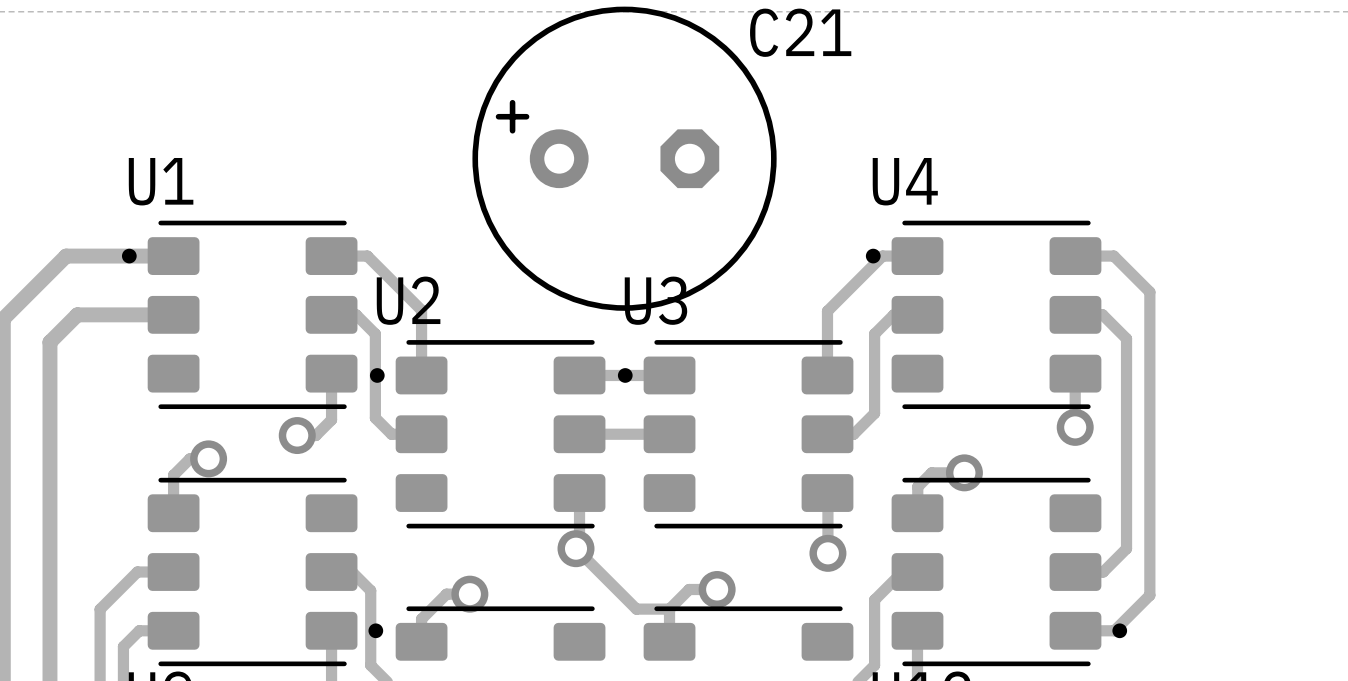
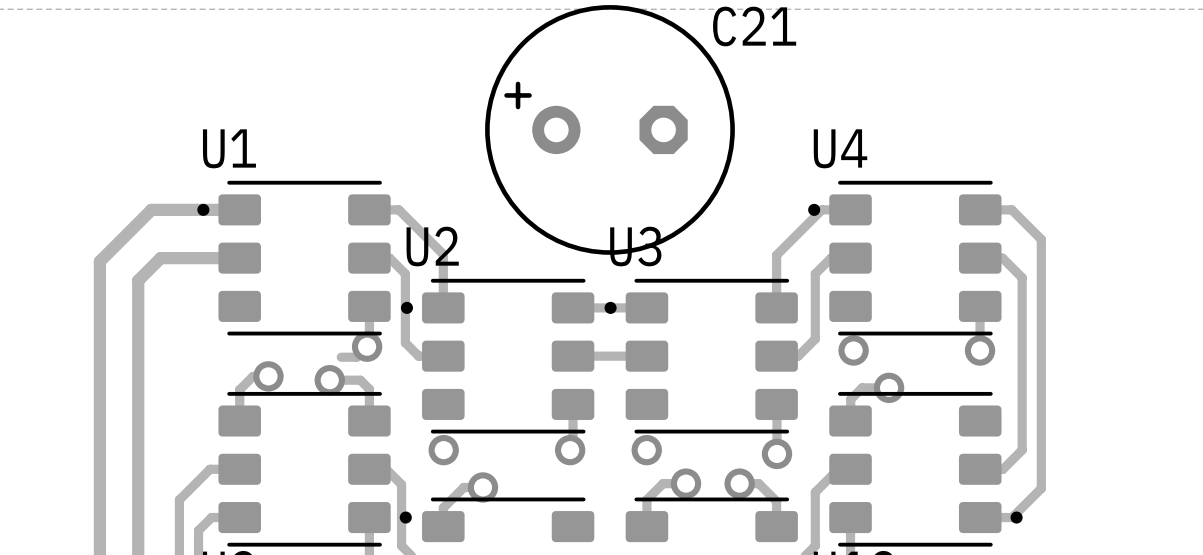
via: none -> (367, 346)
via: none -> (853, 350)
via: (297, 435) -> none
track: none -> (329, 380) (360, 380) (369, 389) (369, 421)
via: none -> (329, 380)
via: none -> (443, 450)
track: (576, 548) (636, 609) (669, 609) -> none
via: none -> (646, 450)
track: none -> (739, 483) (758, 483) (776, 501) (776, 526)
via: none -> (739, 483)

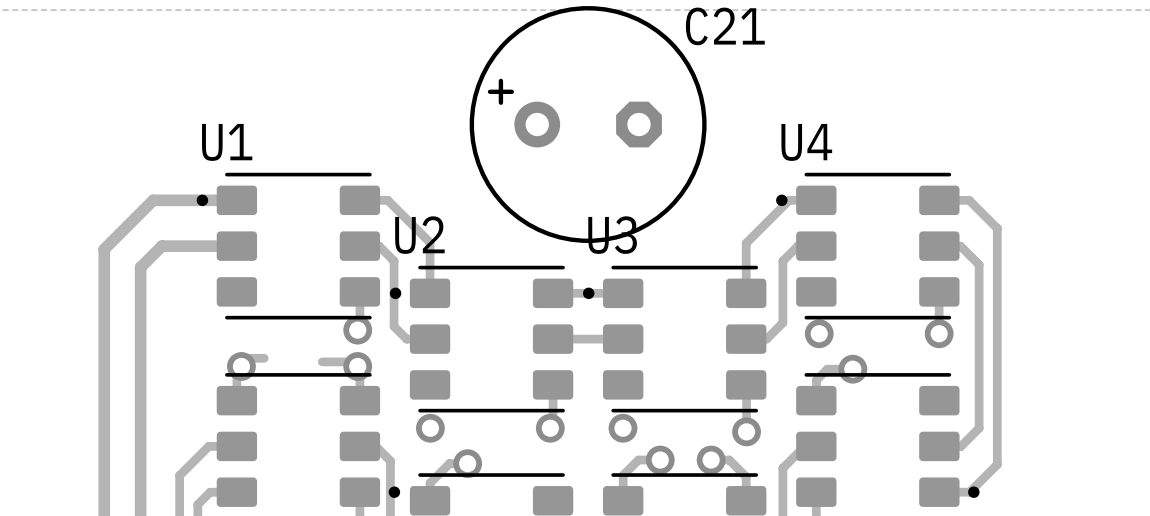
track: (367, 346) (356, 357) (341, 357) -> none
via position: (268, 376) -> (241, 366)
via position: (329, 380) -> (357, 366)

